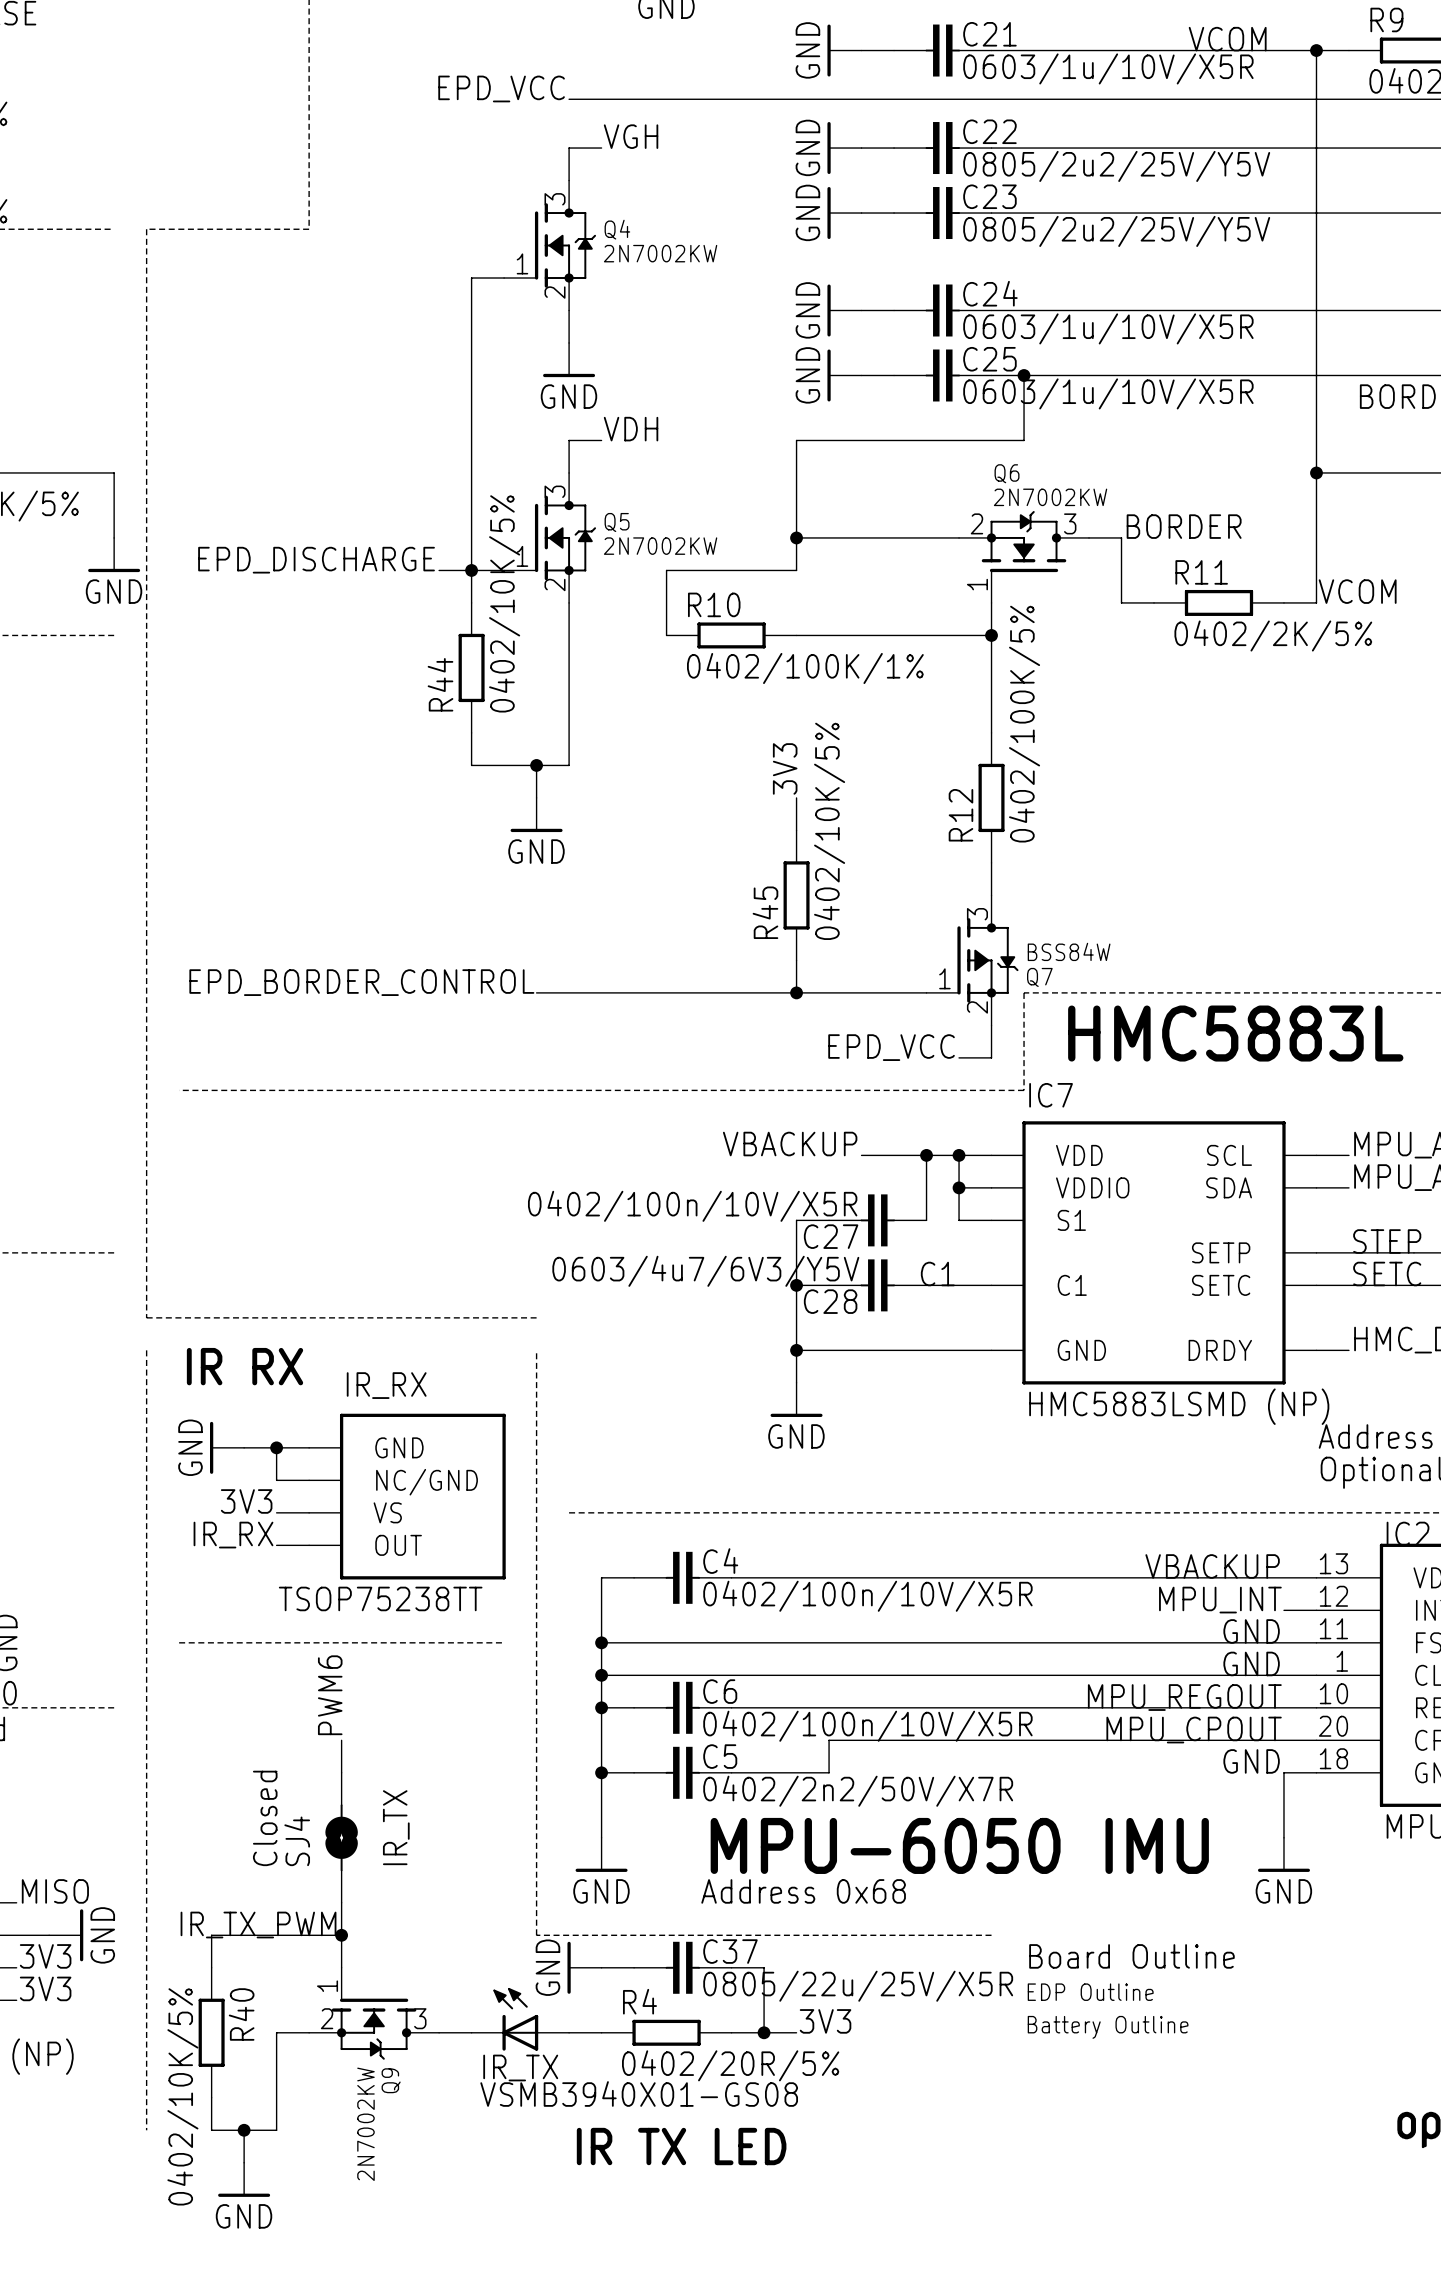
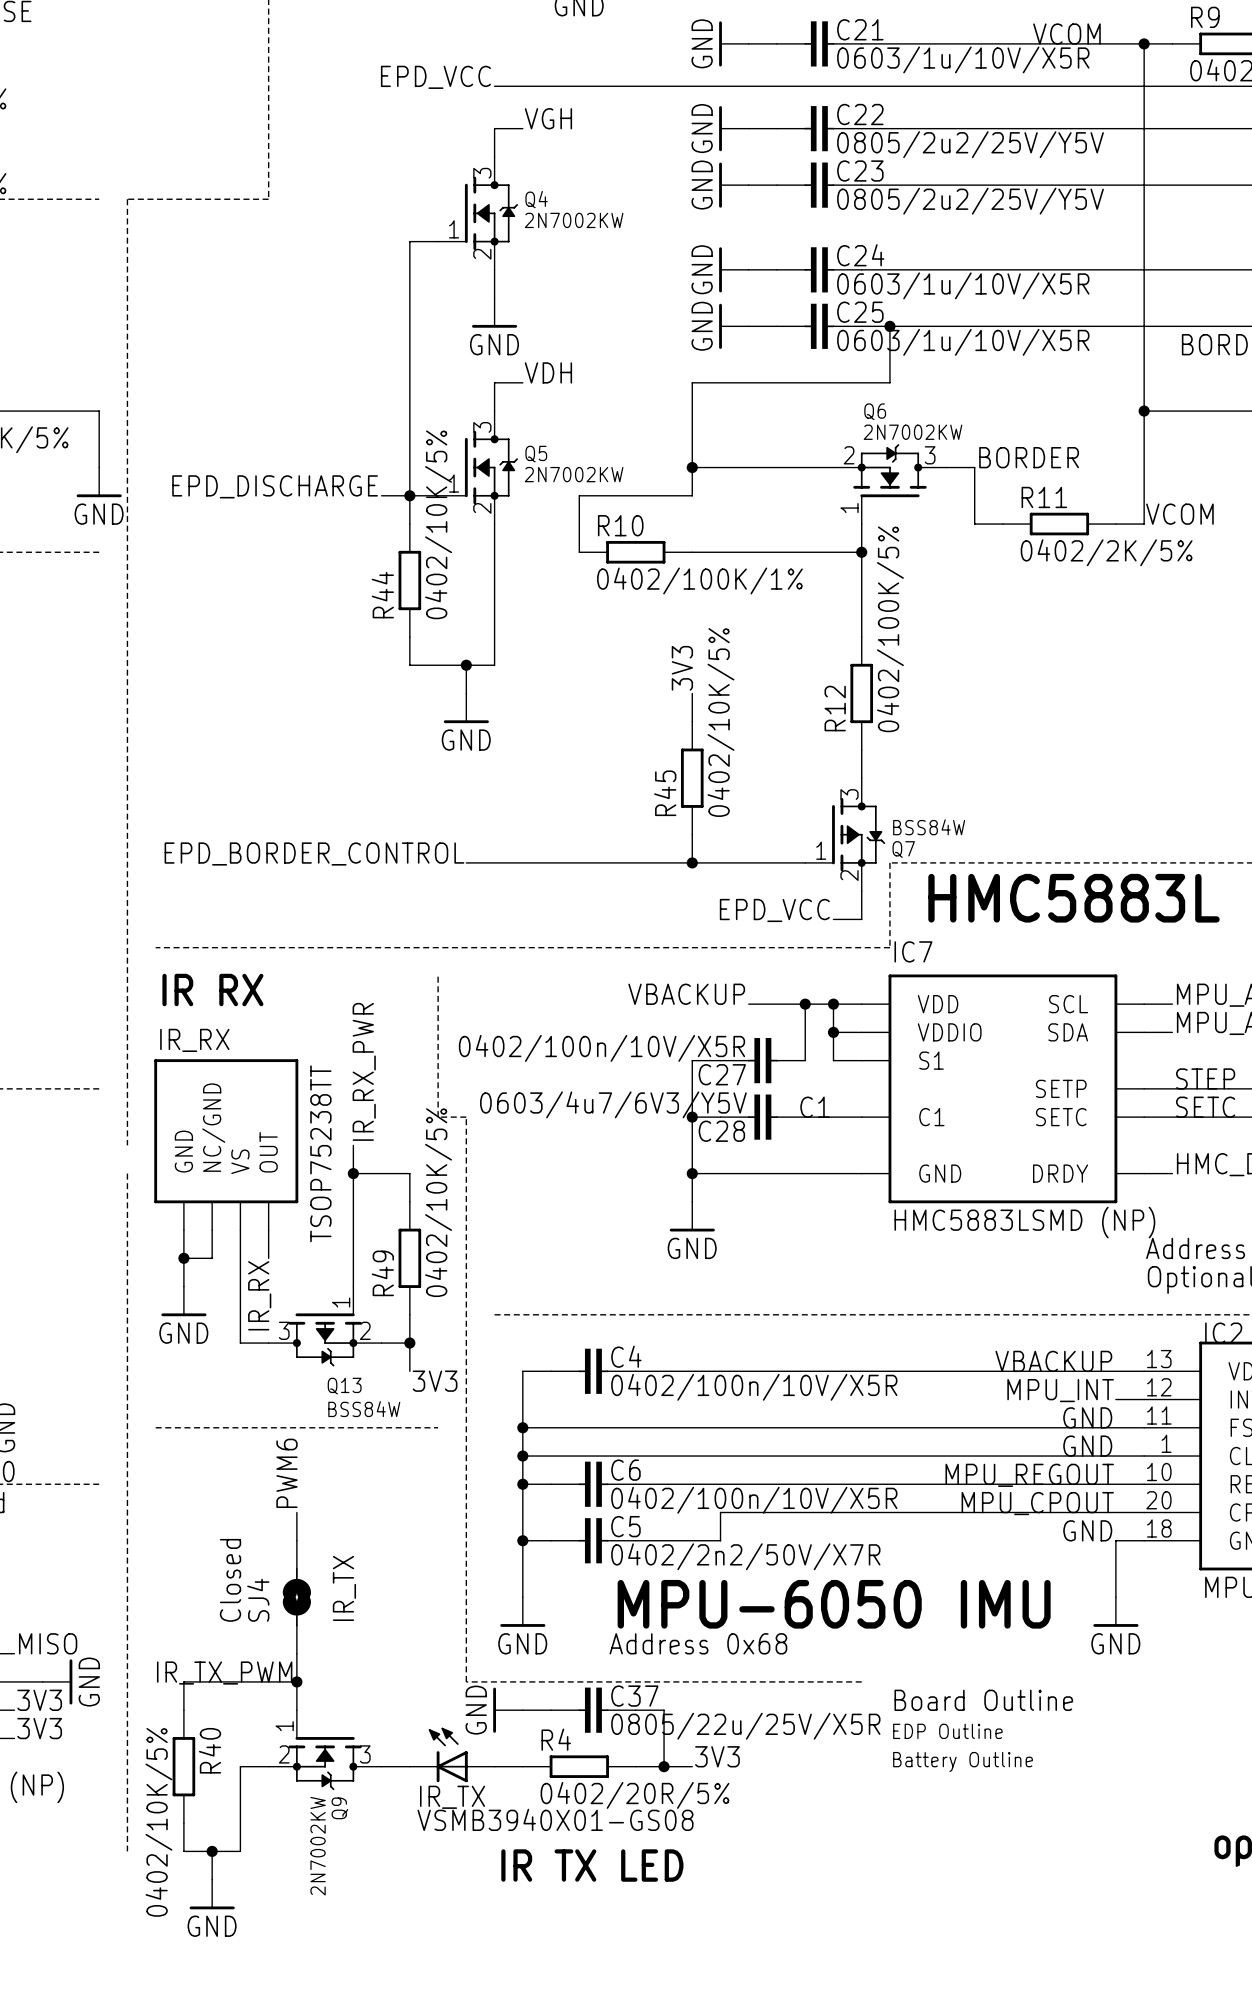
wire: none -> (438, 975) (438, 1117) (466, 1117) (466, 1173)
label: none -> IR_RX_PWR (364, 1071)
wire: (146, 1317) (536, 1317) -> none
wire: none -> (353, 1145) (353, 1286)
wire: none -> (353, 1173) (409, 1173) (409, 1201)
junction: none -> (353, 1173)
text position: IR RX (245, 1366) -> IR RX (212, 990)
wire: none -> (212, 1230) (212, 1258) (183, 1258)
wire: none -> (240, 1230) (240, 1258)
power symbol rotation: 0° (211, 1447) -> 90° counterclockwise (183, 1314)
power symbol position: GND (227, 1447) -> GND (183, 1301)
wire: (244, 1447) (309, 1447) -> (268, 1230) (268, 1258)
junction position: (276, 1447) -> (183, 1258)
R49: none -> 0402/10K/5% (409, 1258)
wire: (276, 1480) (309, 1480) -> (240, 1286) (240, 1343)
IR_RX position: (407, 1496) -> (226, 1144)
IR_RX rotation: 0° (422, 1496) -> 90° counterclockwise (226, 1131)
label position: 3V3 (246, 1501) -> 3V3 (435, 1381)
wire: (276, 1512) (309, 1512) -> (381, 1343) (409, 1343)
wire: none -> (409, 1314) (409, 1371)
Q13: none -> BSS84W (325, 1326)
label rotation: 0° (233, 1535) -> 90° counterclockwise (259, 1295)
junction: none -> (409, 1343)

